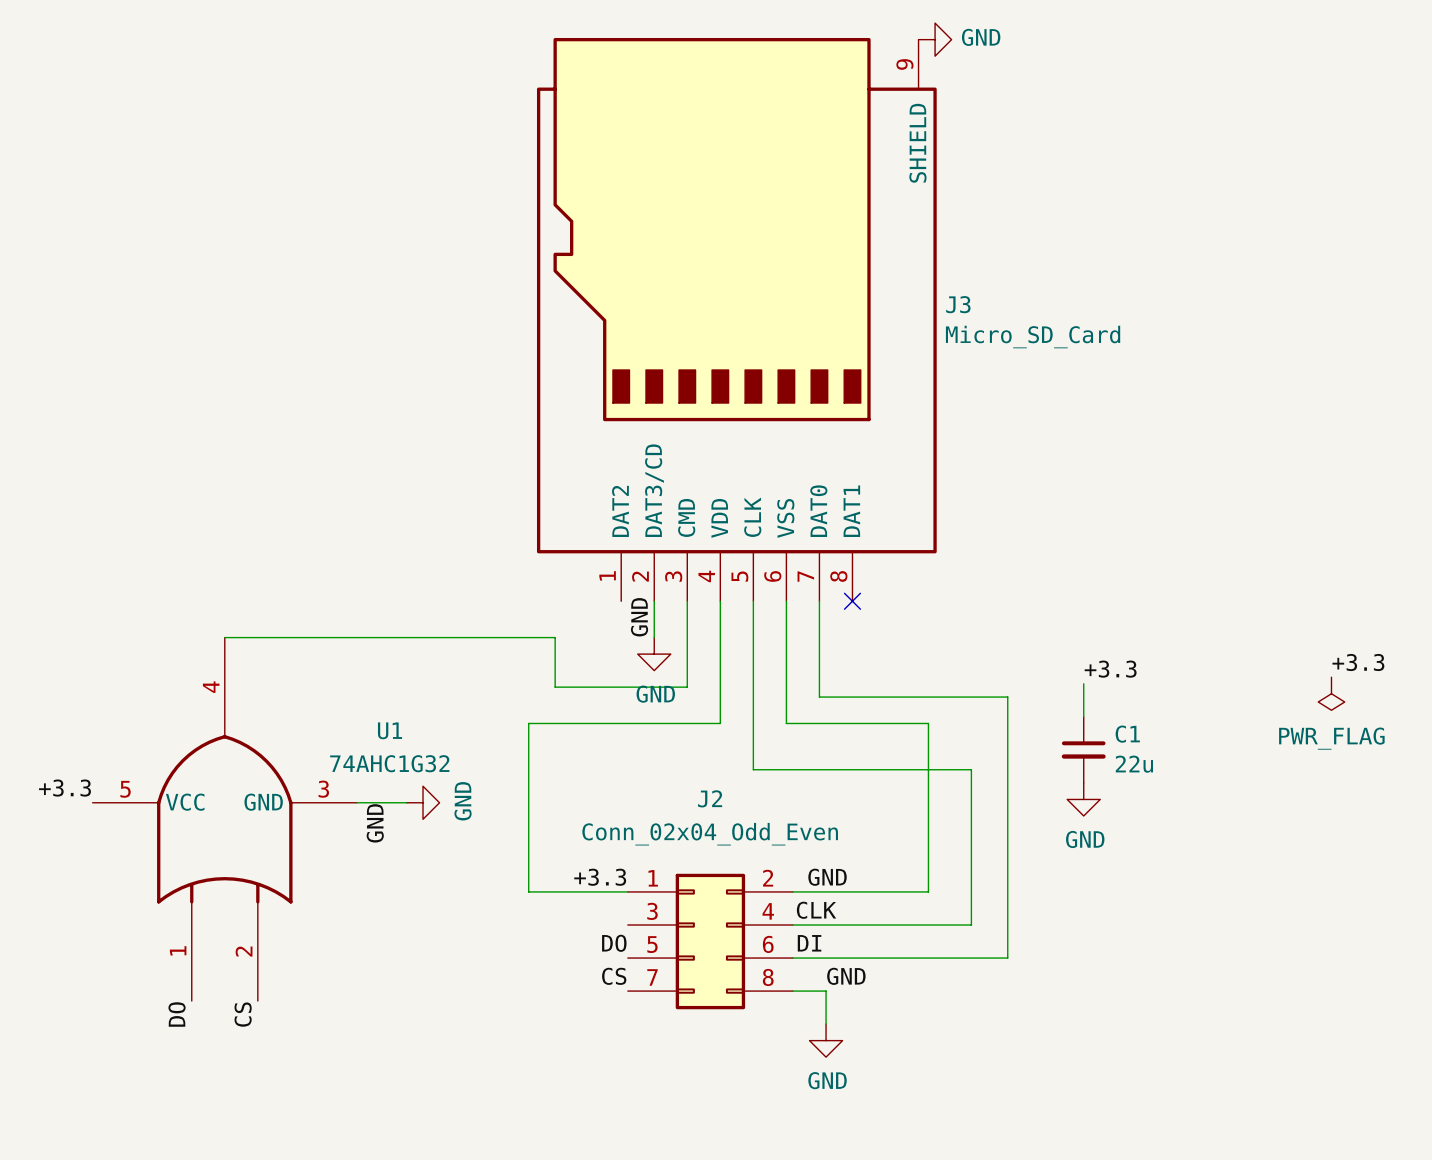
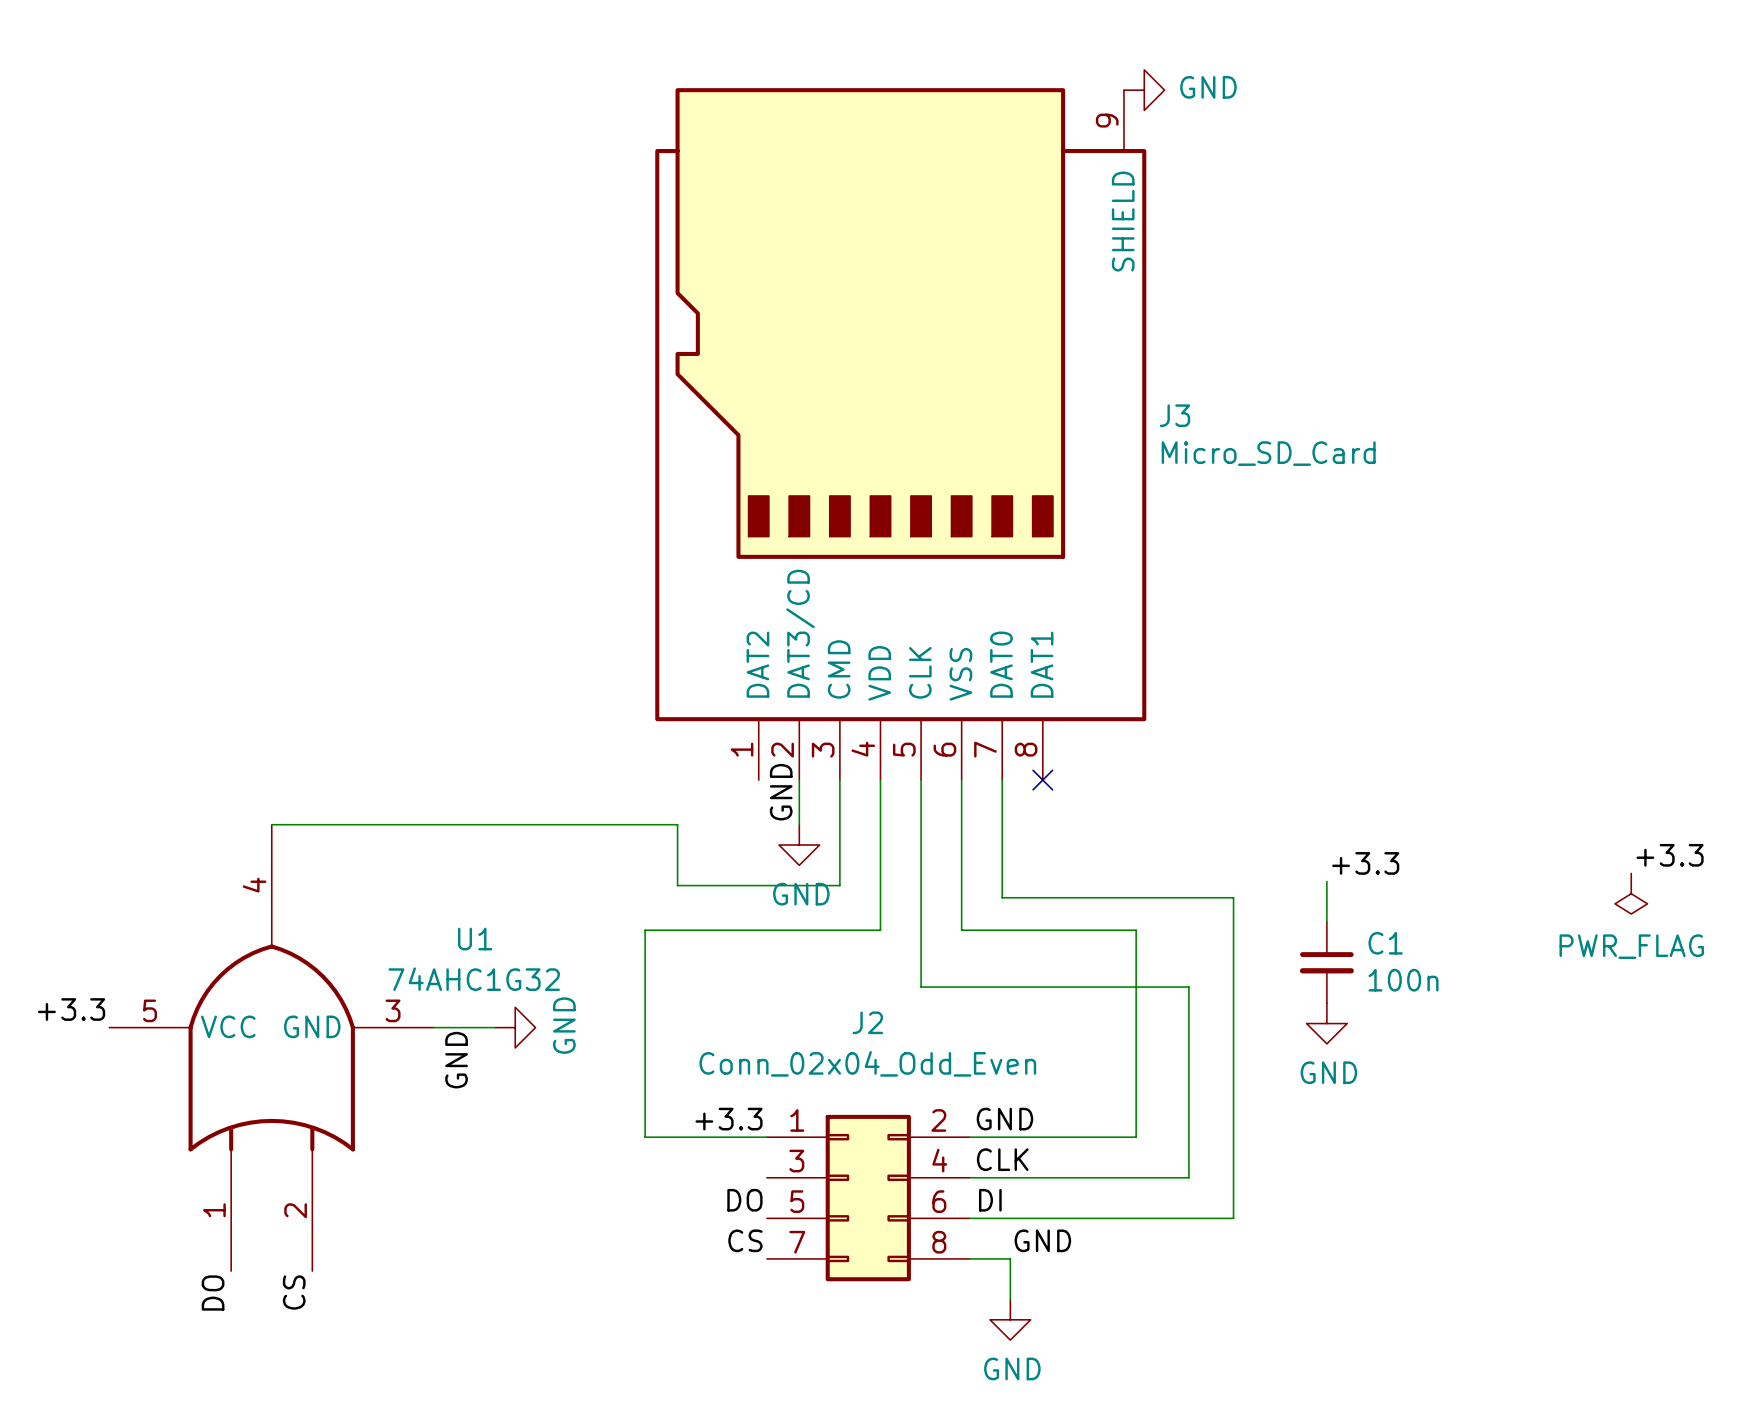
C1 value: 22u (1134, 764) -> 100n (1403, 980)

